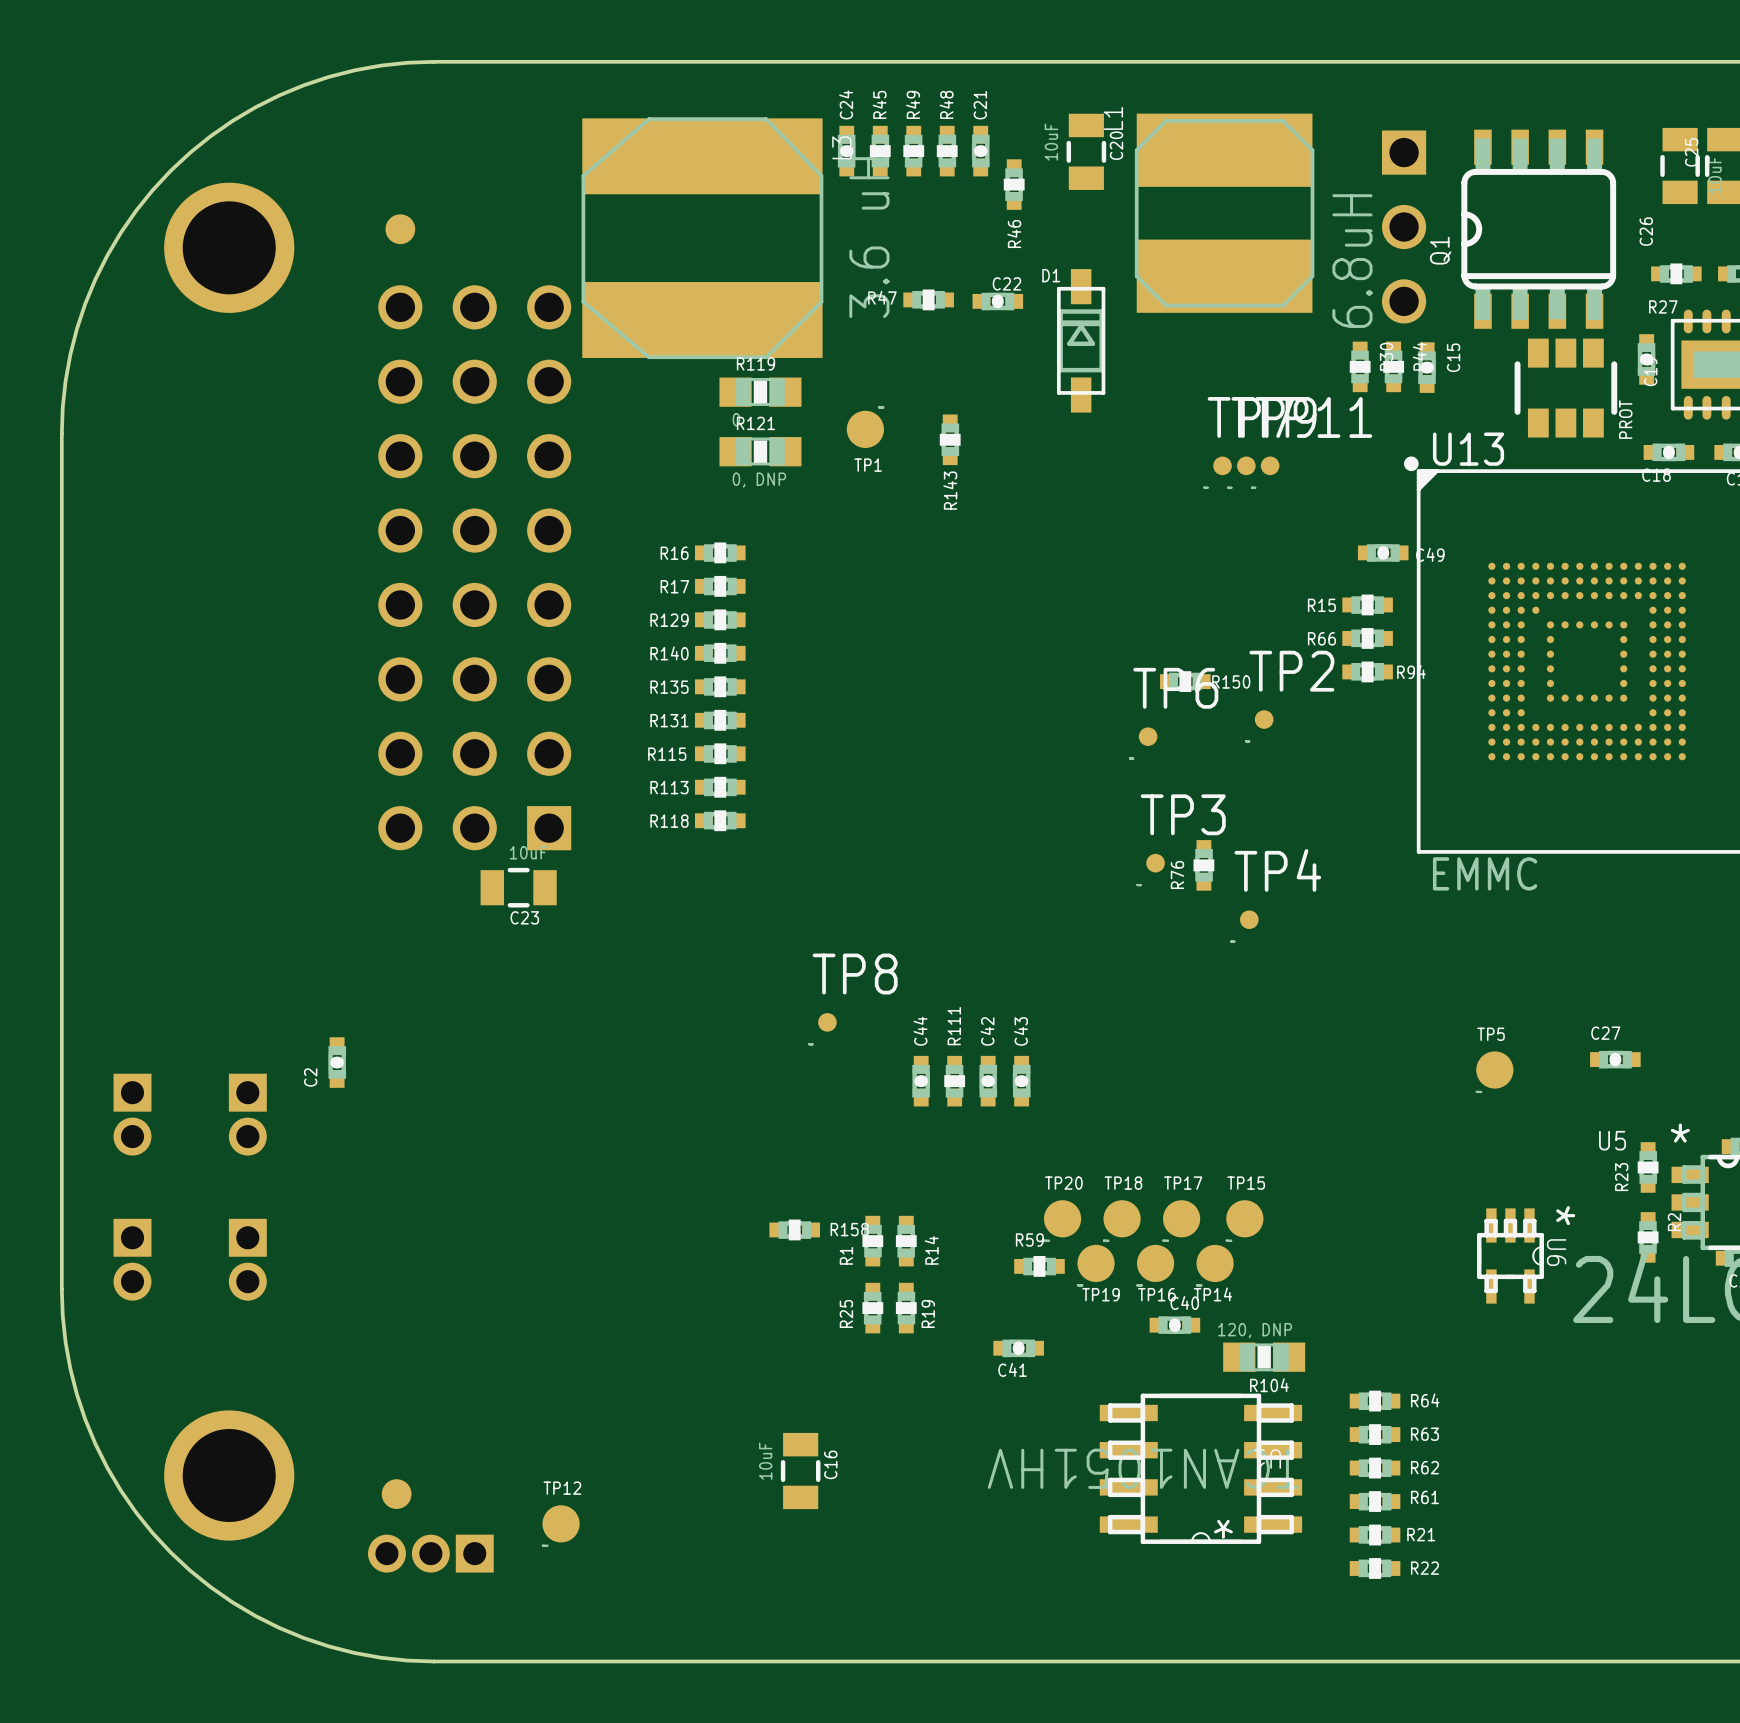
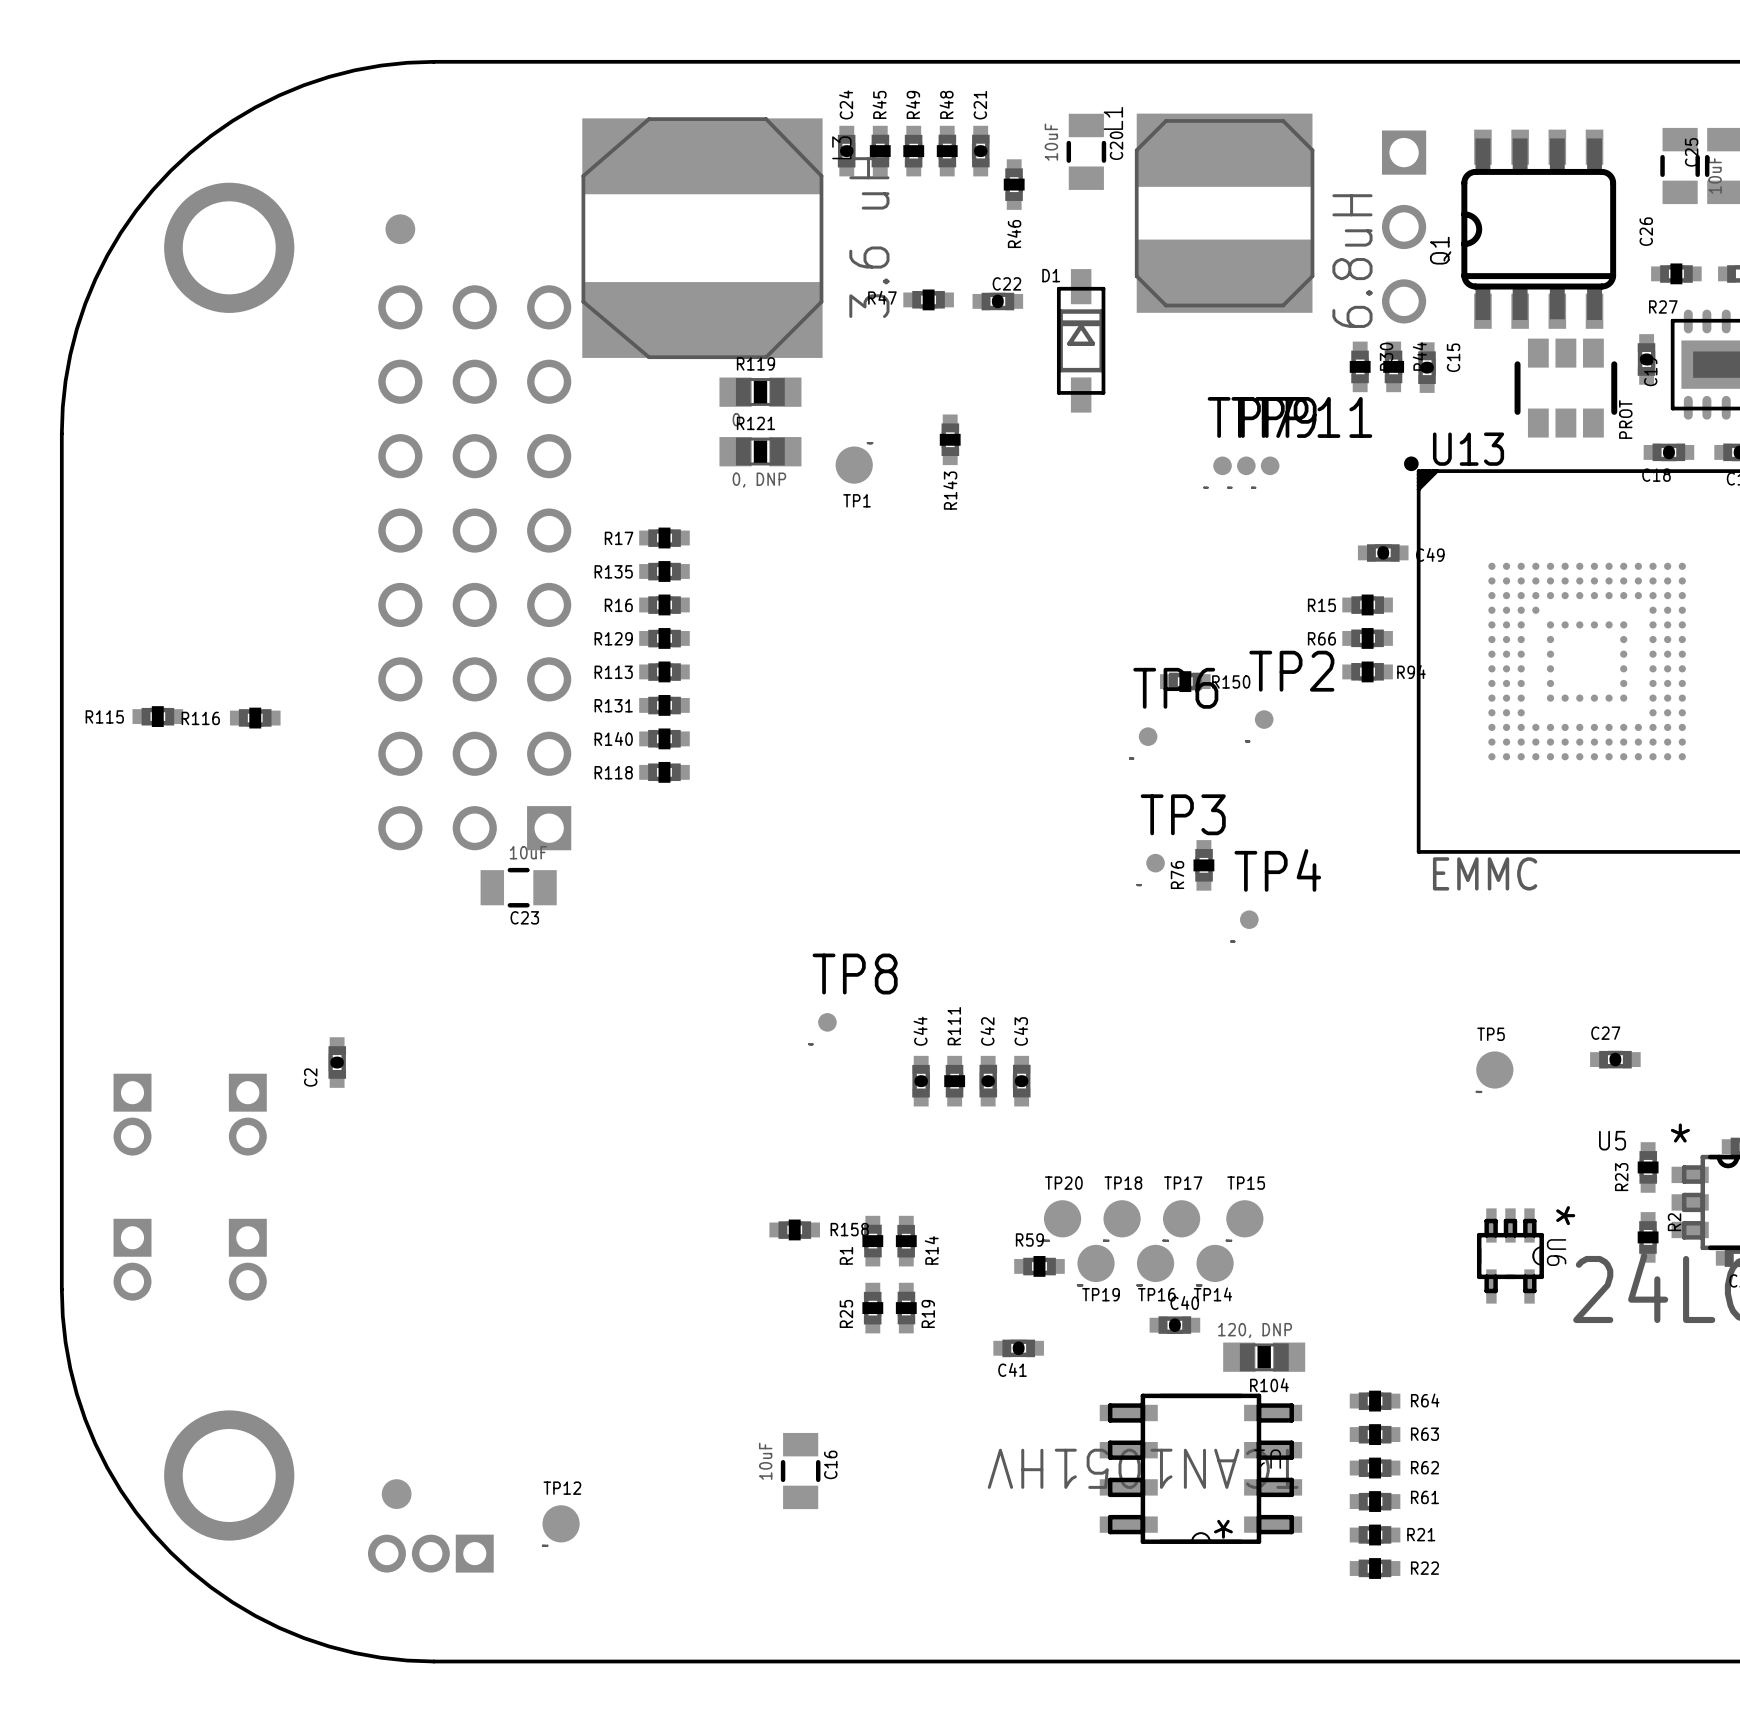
TP1 position: (865, 429) -> (854, 465)
R16 position: (720, 552) -> (664, 604)
R17 position: (720, 586) -> (664, 538)
R129 position: (720, 619) -> (664, 638)
R140 position: (720, 653) -> (664, 738)
R135 position: (720, 686) -> (664, 571)
R116: none -> (255, 718)
R131 position: (720, 720) -> (664, 705)
R115 position: (720, 753) -> (157, 716)
R113 position: (720, 787) -> (664, 671)
R118 position: (720, 820) -> (664, 772)

